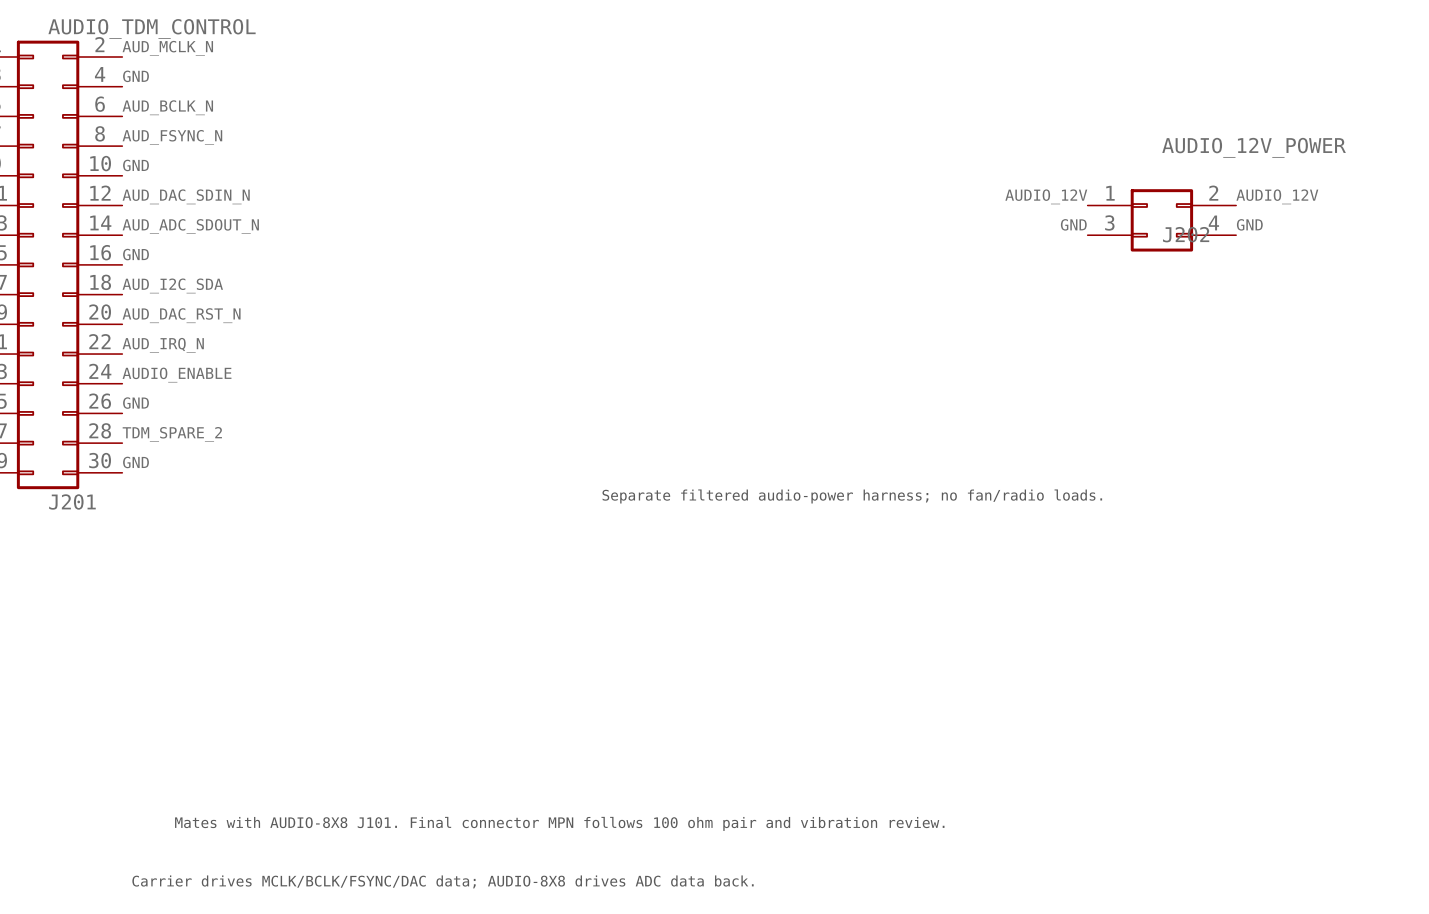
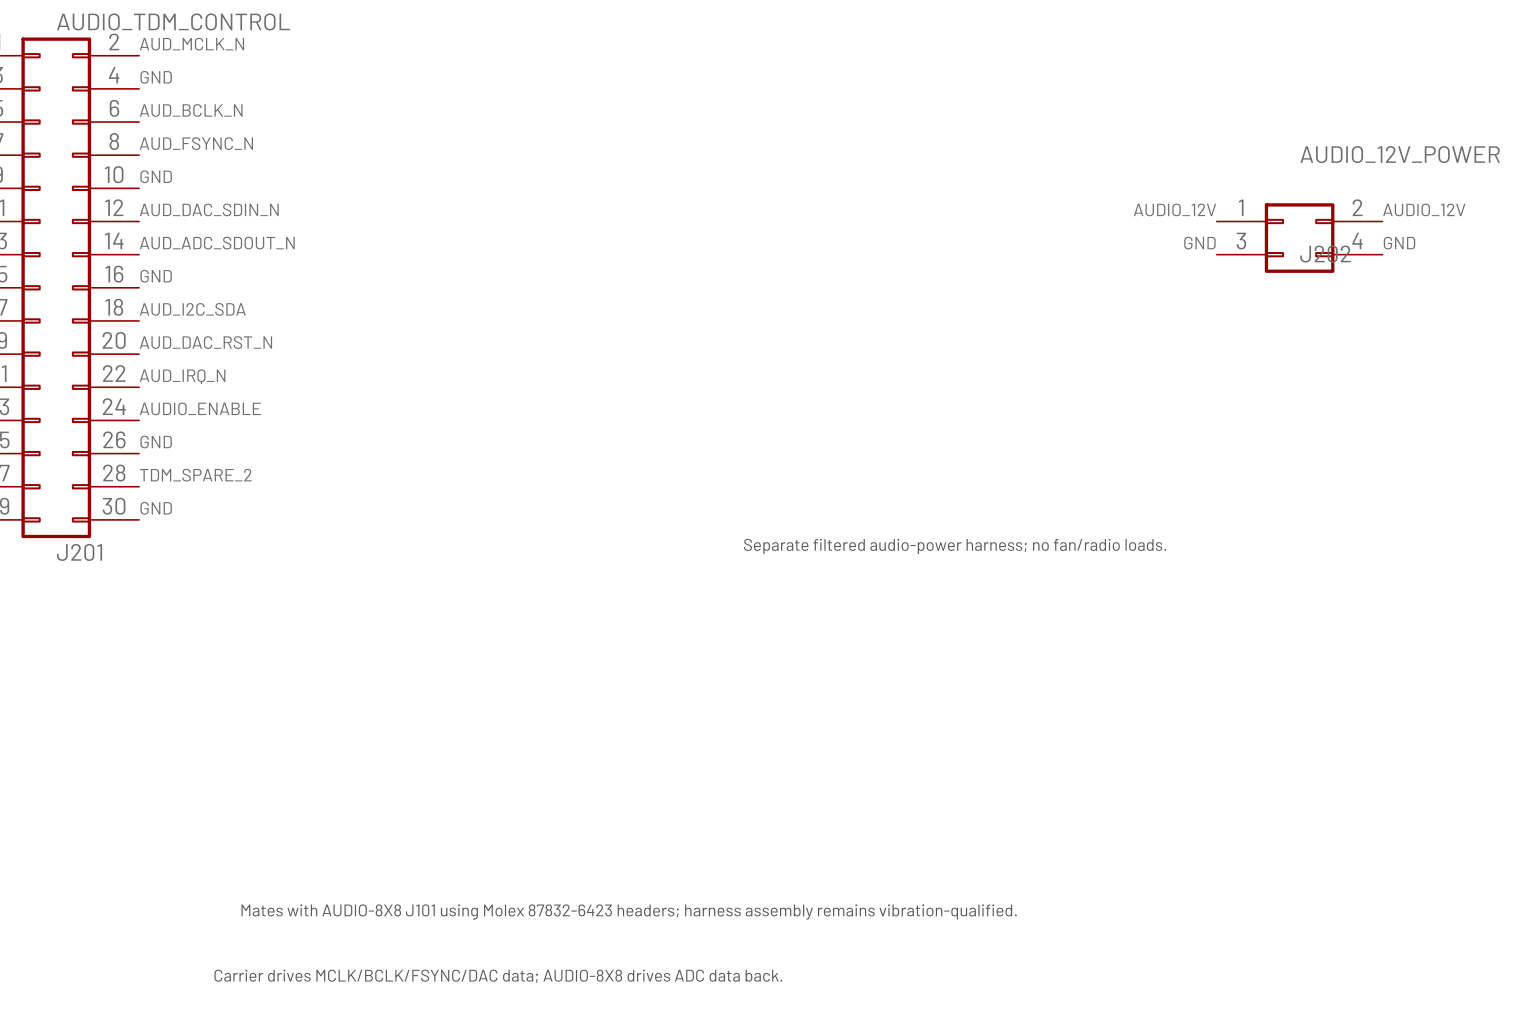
text: Mates with AUDIO-8X8 J101. Final connector MPN follows 100 ohm pair and vibration review. (559, 823) -> Mates with AUDIO-8X8 J101 using Molex 87832-6423 headers; harness assembly remains vibration-qualified. (629, 912)

